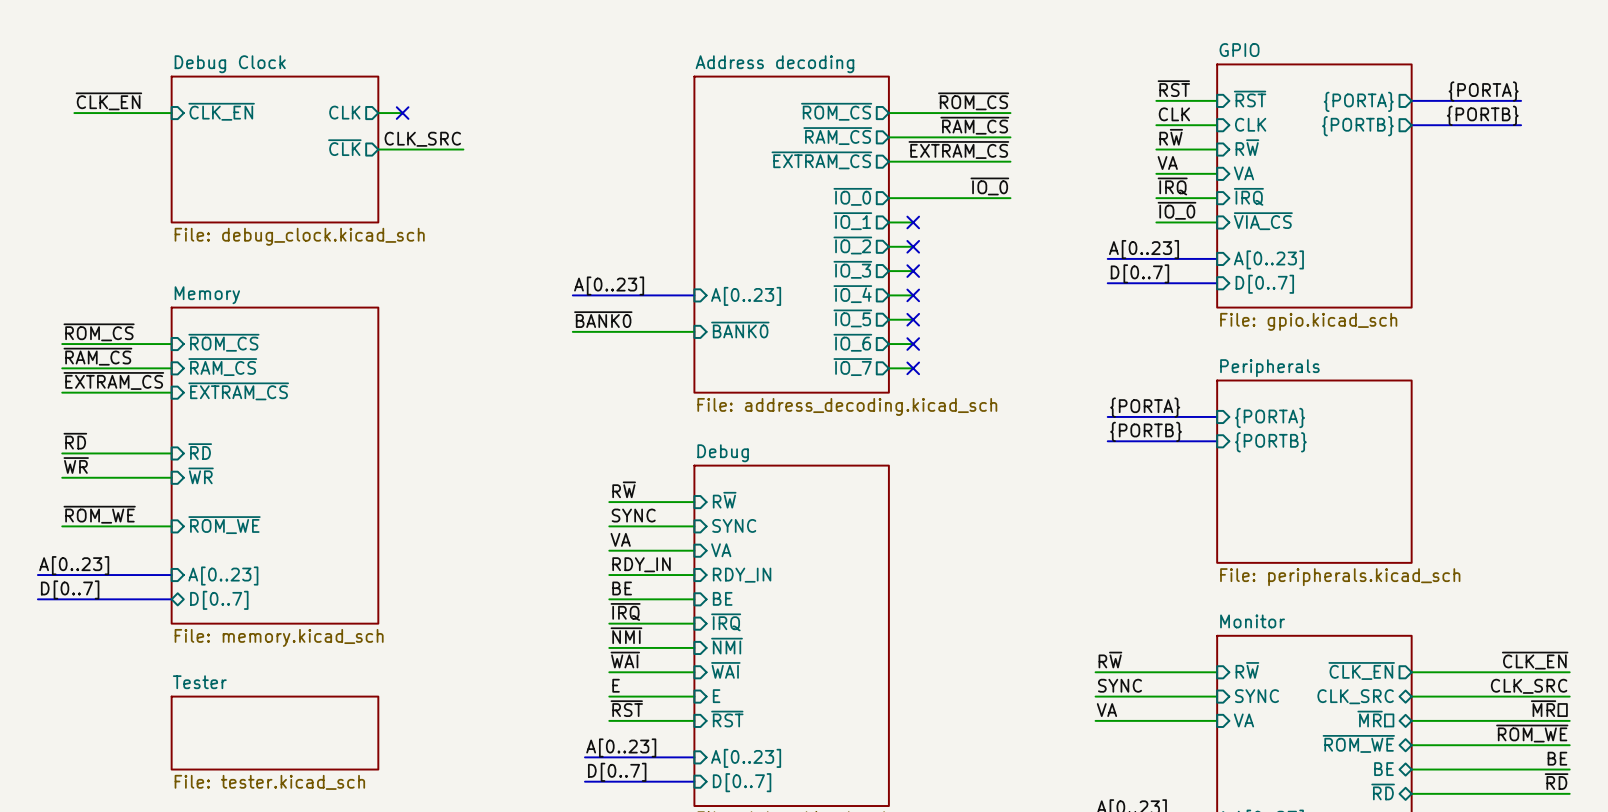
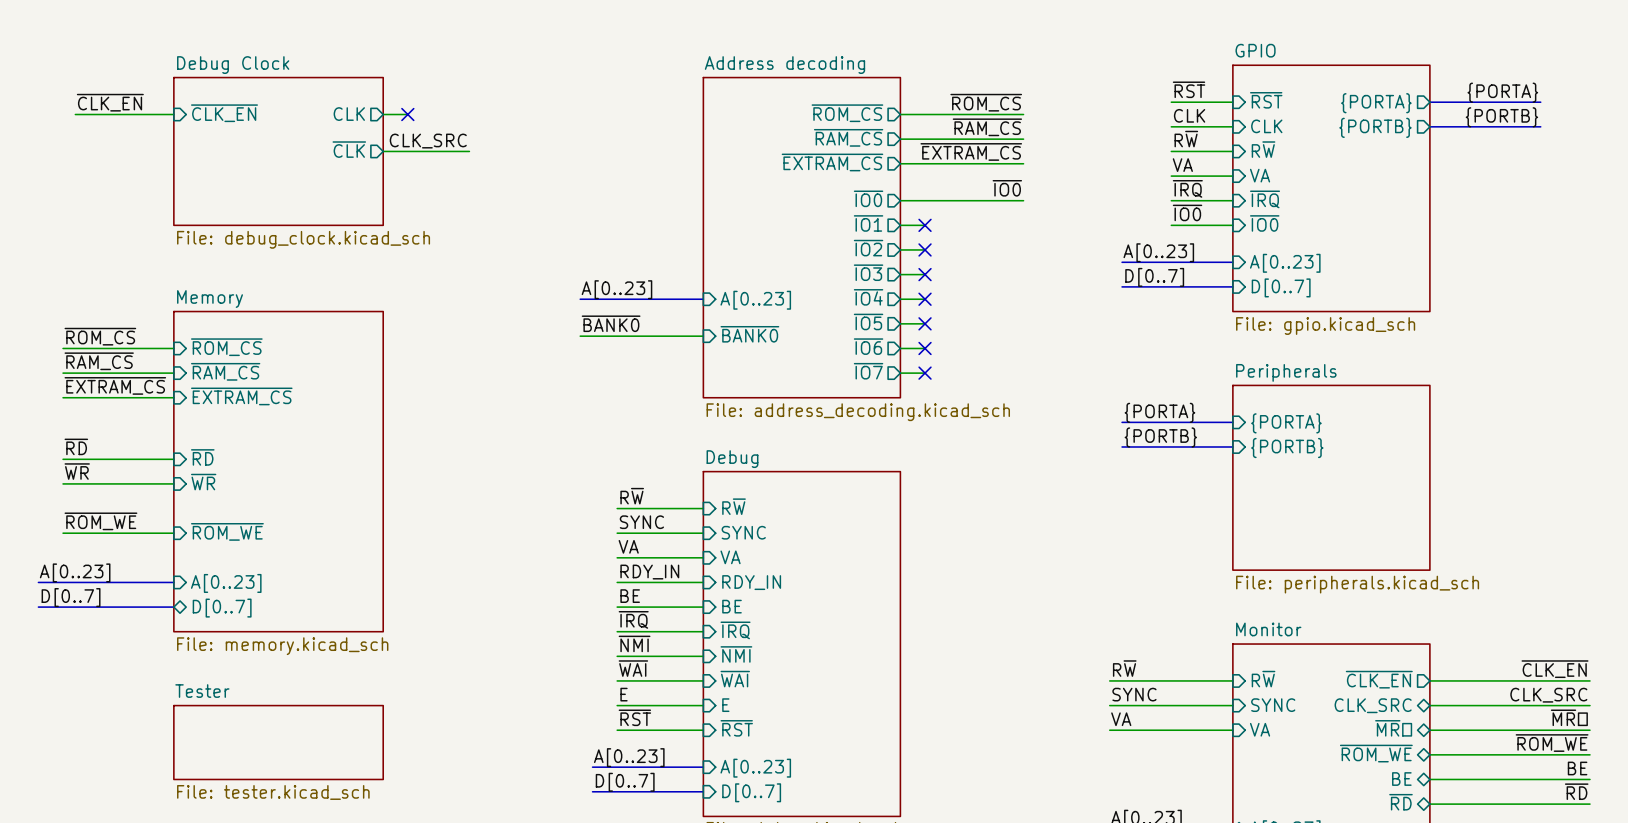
label: ~{IO_0} (989, 186) -> ~{IO0} (1007, 188)
sheet pin: ~{IO_0} (852, 196) -> ~{IO0} (868, 198)
label: ~{IO_0} (1177, 210) -> ~{IO0} (1187, 212)
sheet pin: ~{IO_1} (852, 221) -> ~{IO1} (868, 223)
sheet pin: ~{VIA_CS} (1263, 221) -> ~{IO0} (1264, 223)
sheet pin: ~{IO_2} (852, 245) -> ~{IO2} (868, 248)
sheet pin: ~{IO_3} (852, 269) -> ~{IO3} (868, 272)
sheet pin: ~{IO_4} (852, 294) -> ~{IO4} (868, 297)
sheet pin: ~{IO_5} (852, 318) -> ~{IO5} (868, 321)
sheet pin: ~{IO_6} (852, 342) -> ~{IO6} (868, 346)
sheet pin: ~{IO_7} (852, 367) -> ~{IO7} (868, 371)

